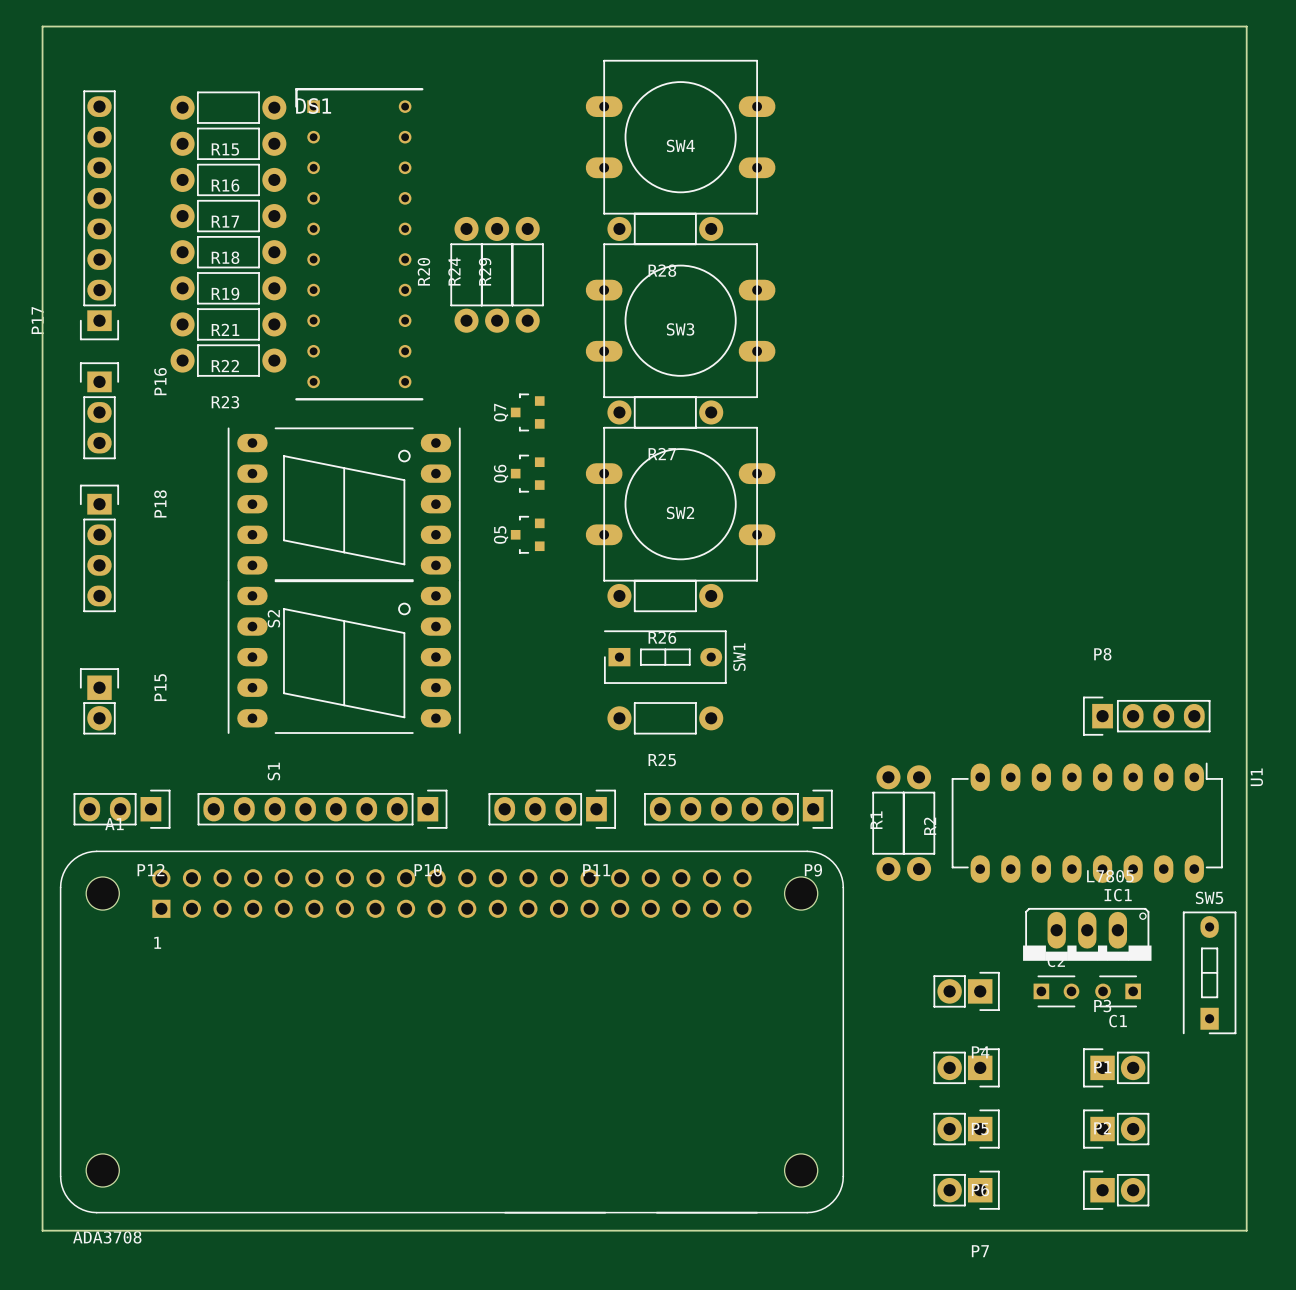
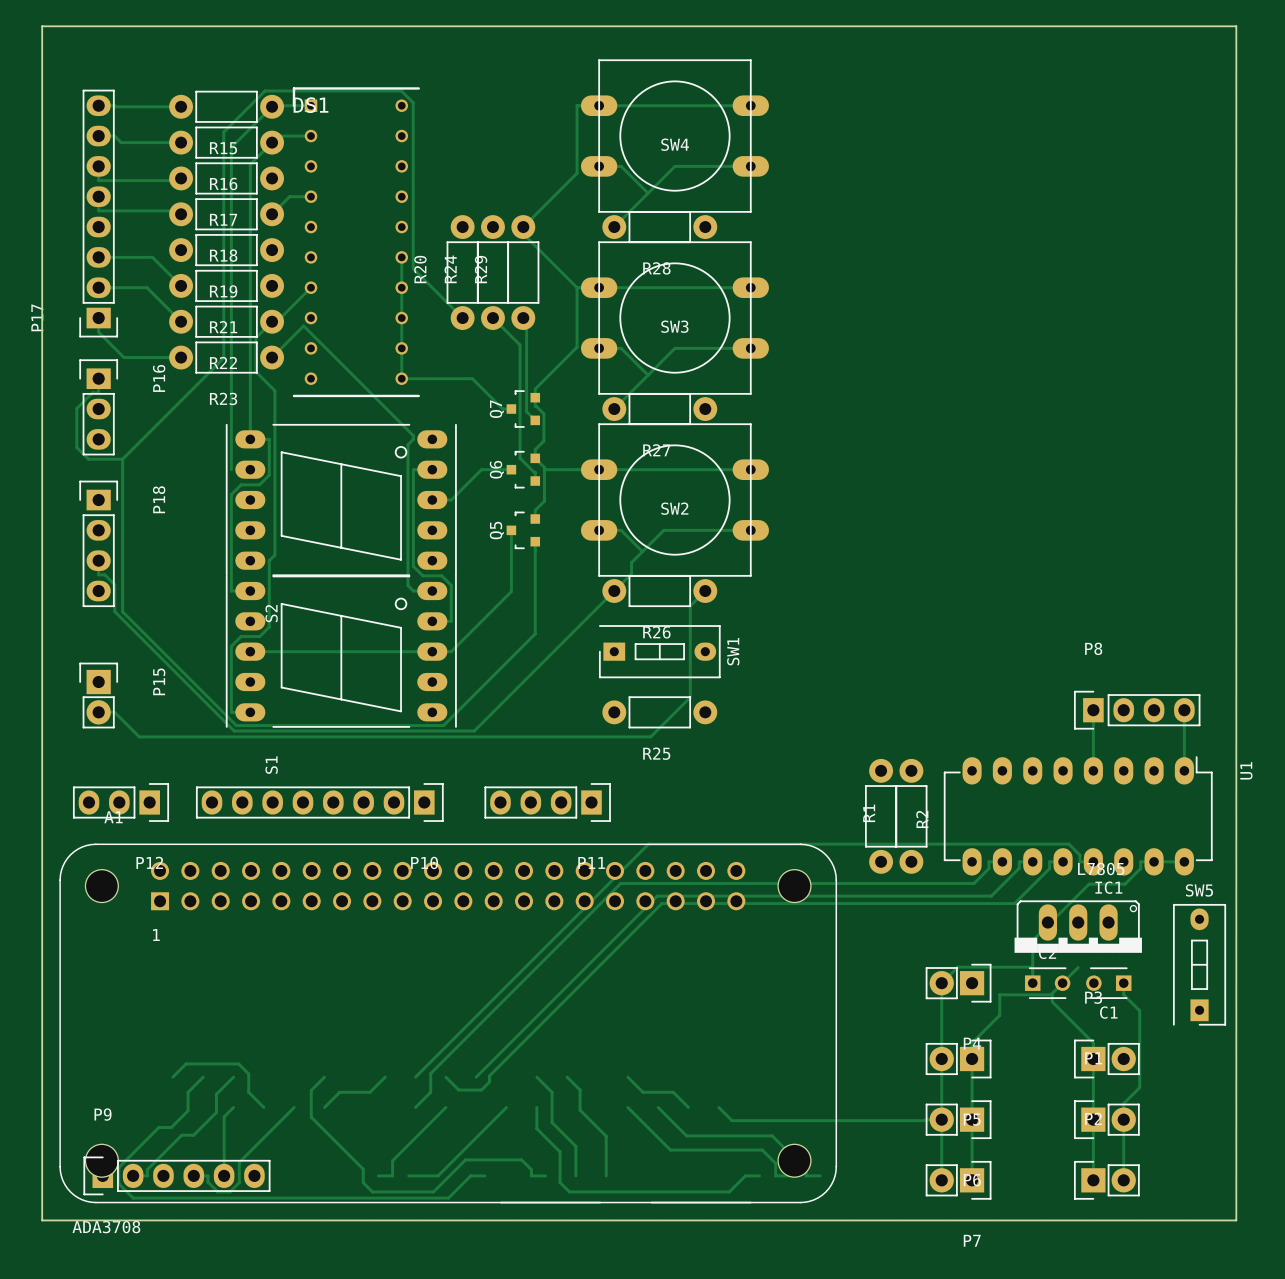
track: none -> (98, 105) (181, 106)
track: none -> (310, 105) (273, 105) (231, 147) (231, 469)
track: none -> (750, 105) (577, 105) (577, 173) (523, 227) (523, 233) (577, 287)
track: none -> (98, 136) (114, 136) (121, 142) (181, 142)
track: none -> (310, 136) (278, 136) (250, 164) (250, 439) (269, 439) (269, 475) (259, 484) (241, 484) (231, 494) (231, 591) (250, 591)
track: none -> (98, 166) (98, 180) (178, 180) (181, 178)
track: none -> (599, 166) (621, 166) (648, 193)
track: none -> (750, 166) (674, 166) (614, 227)
track: none -> (98, 196) (98, 210) (177, 210) (181, 214)
track: none -> (310, 196) (289, 196) (272, 214)
track: none -> (98, 257) (152, 257) (181, 285)
track: none -> (401, 257) (401, 378) (472, 378) (502, 409) (511, 409)
track: none -> (98, 287) (147, 287) (181, 321)
track: none -> (310, 287) (276, 321) (272, 321) (255, 337) (255, 371) (274, 390) (274, 555) (269, 560) (269, 627) (259, 636) (241, 636) (231, 646) (231, 712) (250, 712)
track: none -> (577, 287) (750, 287)
track: none -> (577, 287) (577, 347) (535, 389) (535, 406) (543, 413) (543, 441) (535, 449) (535, 458) (544, 467) (544, 501) (535, 510) (535, 519)
track: none -> (98, 318) (98, 332) (124, 357) (181, 357)
track: none -> (462, 318) (413, 268) (413, 102) (401, 90) (265, 90) (223, 132) (223, 358) (122, 459)
track: none -> (492, 318) (520, 345) (520, 458) (535, 472) (535, 481)
track: none -> (523, 318) (526, 321) (526, 411) (535, 420)
track: none -> (599, 348) (621, 348) (648, 375)
track: none -> (750, 348) (674, 348) (614, 409)
track: none -> (272, 357) (303, 325) (413, 435) (413, 439) (407, 444) (407, 585) (413, 591) (432, 591)
track: none -> (98, 378) (98, 392) (92, 392) (76, 408) (76, 447) (88, 459) (122, 459)
track: none -> (122, 459) (122, 611) (236, 725) (443, 725) (535, 633) (535, 541)
track: none -> (432, 469) (413, 469) (413, 566) (422, 575) (441, 575) (451, 585) (451, 621) (432, 621)
track: none -> (511, 469) (481, 469) (451, 500) (432, 500)
track: none -> (544, 469) (750, 469)
track: none -> (511, 530) (511, 591) (451, 651) (250, 651)
track: none -> (599, 530) (621, 530) (642, 551)
track: none -> (750, 530) (663, 530) (631, 562) (631, 573) (474, 731) (234, 731) (114, 611) (114, 584) (104, 574) (98, 574) (98, 560)
track: none -> (705, 591) (690, 606) (690, 697) (650, 736) (139, 736) (114, 712) (98, 712)
track: none -> (1093, 710) (1093, 770)
track: none -> (1184, 710) (1184, 770)
P9 rotation: 0° (738, 809) -> 180° (176, 1175)
P9 position: (738, 809) -> (176, 1175)
track: none -> (1002, 861) (988, 861) (988, 868) (974, 883) (620, 883) (430, 1073) (430, 1092) (415, 1107)
track: none -> (1032, 861) (1019, 861) (1019, 868) (991, 896) (657, 896) (476, 1077)
track: none -> (1063, 861) (1049, 861) (1049, 868) (1014, 903) (661, 903) (489, 1075) (489, 1082) (481, 1090) (458, 1090) (445, 1077)
track: none -> (1093, 861) (1079, 861) (1079, 855) (1068, 844) (648, 844) (415, 1077)
track: none -> (1184, 861) (1140, 861) (1140, 868) (1125, 884) (1089, 884) (1032, 940) (1032, 983)
track: none -> (1032, 967) (957, 967) (941, 983) (941, 1180)
track: none -> (1078, 967) (1052, 993) (1052, 1001) (1093, 1042) (1093, 1180)
track: none -> (1123, 983) (1123, 994) (1139, 1010) (1139, 1087) (1123, 1103) (1123, 1180)
track: none -> (1052, 994) (999, 994) (999, 1015) (972, 1042) (972, 1180)
track: none -> (172, 1077) (186, 1063) (238, 1063) (248, 1073) (248, 1092) (263, 1107)
track: none -> (203, 1077) (188, 1092) (188, 1110) (171, 1127) (158, 1127) (118, 1167) (118, 1183) (133, 1198) (448, 1198) (470, 1175) (484, 1175)
track: none -> (233, 1077) (216, 1094) (216, 1112) (193, 1135) (181, 1135) (147, 1169) (147, 1175) (133, 1175)
track: none -> (324, 1077) (311, 1090) (311, 1117) (363, 1169) (363, 1182) (372, 1191) (433, 1191) (465, 1159) (521, 1159) (531, 1169) (531, 1175) (545, 1175)
track: none -> (385, 1077) (370, 1092) (339, 1092) (324, 1107)
track: none -> (536, 1077) (552, 1092) (552, 1122) (575, 1146) (575, 1175)
track: none -> (567, 1077) (580, 1090) (580, 1110) (606, 1136) (606, 1175)
track: none -> (627, 1077) (643, 1092) (673, 1092) (688, 1107)
track: none -> (233, 1107) (224, 1116) (224, 1175)
track: none -> (294, 1107) (239, 1162) (239, 1182) (230, 1191) (217, 1191) (207, 1182) (207, 1175) (193, 1175)
track: none -> (445, 1107) (392, 1160) (392, 1175) (378, 1175)
track: none -> (506, 1107) (438, 1175) (408, 1175)
track: none -> (536, 1107) (536, 1128) (560, 1151) (560, 1182) (569, 1191) (729, 1191) (745, 1175) (759, 1175)
track: none -> (627, 1107) (670, 1150) (762, 1150) (775, 1163) (775, 1175) (789, 1175)
track: none -> (658, 1107) (686, 1135) (772, 1135) (806, 1169) (806, 1175) (820, 1175)
track: none -> (718, 1107) (732, 1120) (941, 1119)

